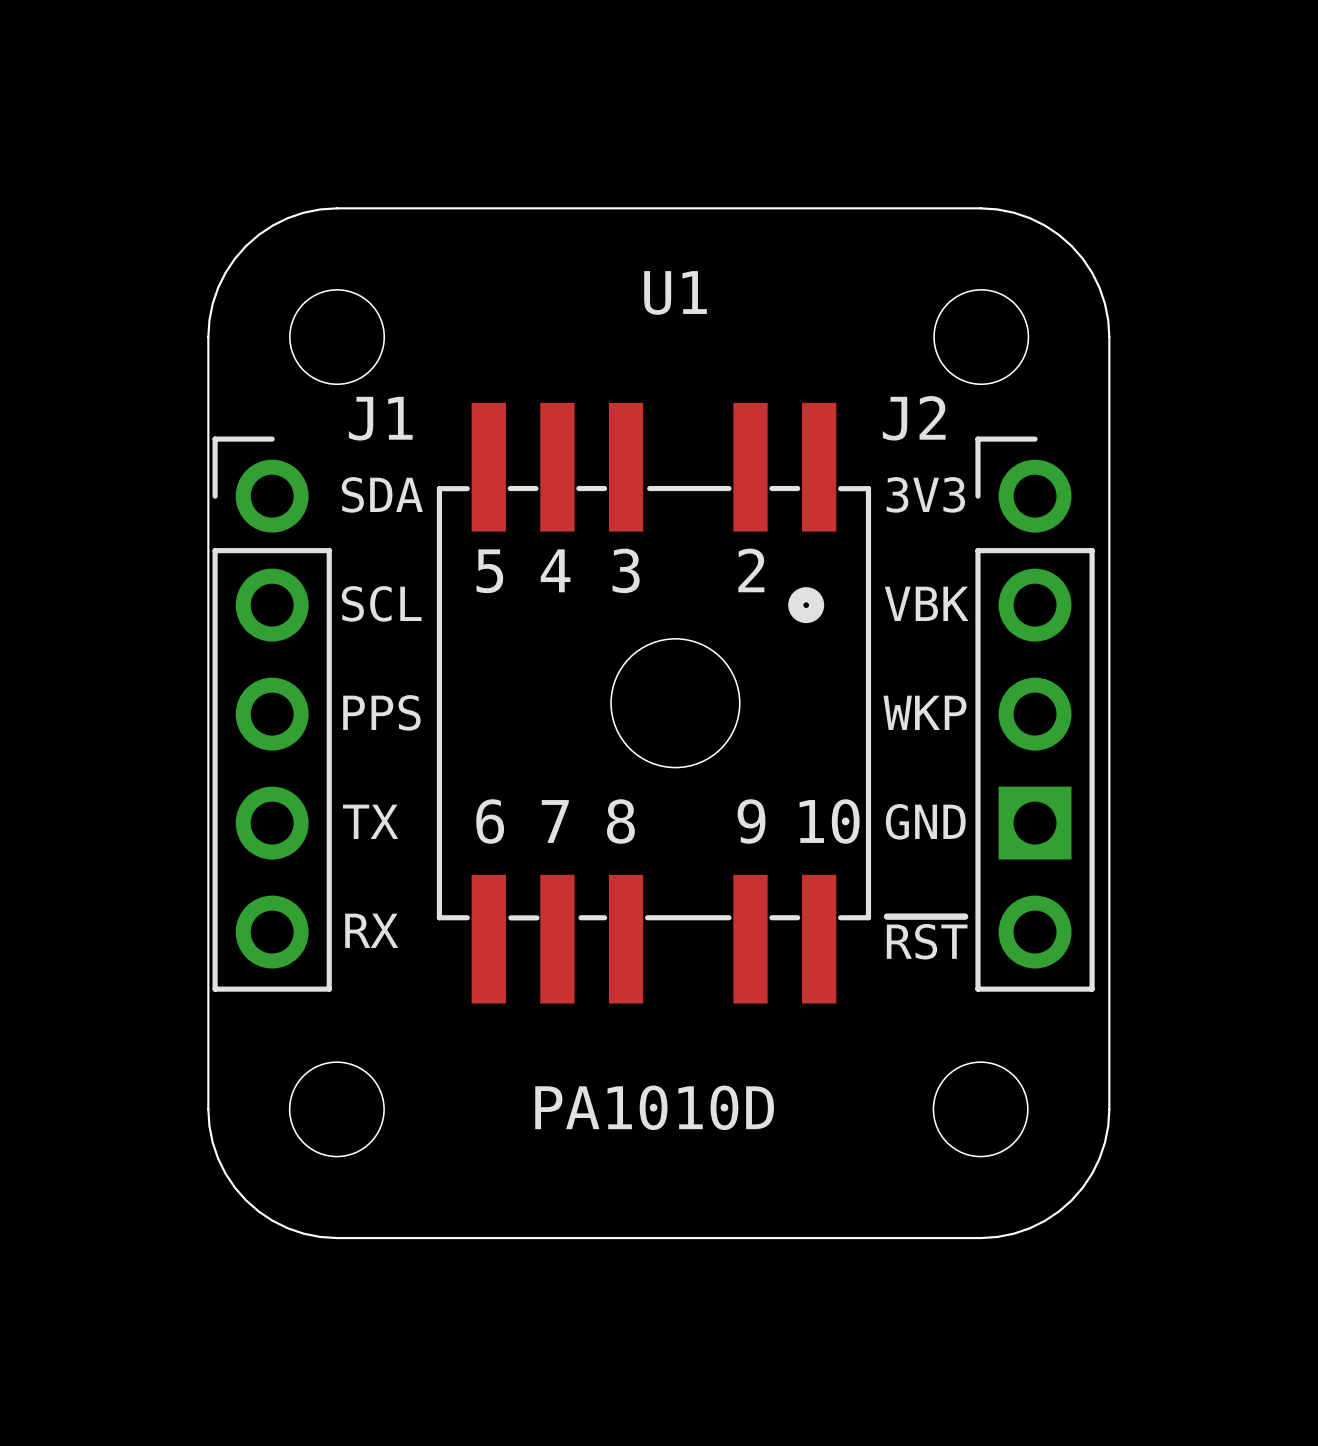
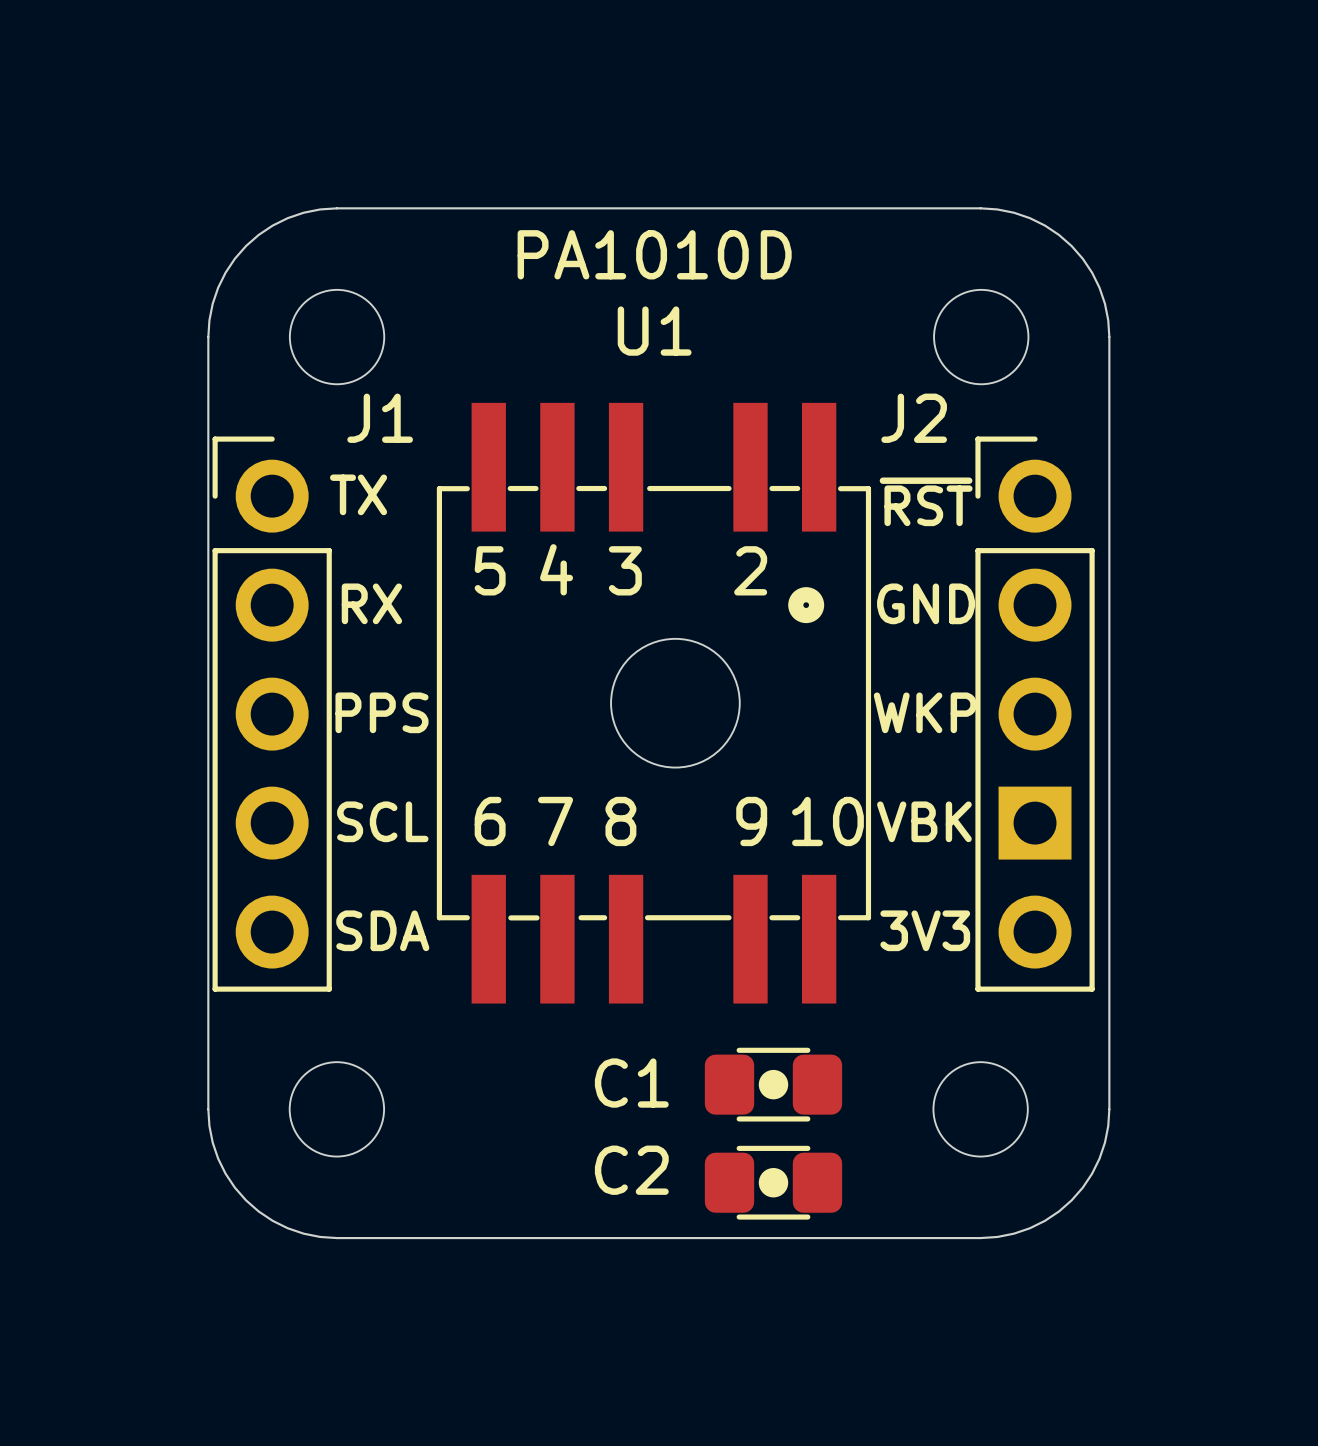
U1 name position: U1 (675, 292) -> U1 (654, 331)
text: SDA (382, 494) -> TX (358, 494)
text: 3V3 (925, 494) -> ~{RST} (926, 501)
text: SCL (381, 603) -> RX (371, 603)
text: VBK (926, 603) -> GND (926, 603)
text: TX (370, 821) -> SCL (382, 821)
text: GND (925, 821) -> VBK (924, 821)
text: RX (371, 930) -> SDA (382, 930)
text: ~{RST} (927, 938) -> 3V3 (925, 930)
C1: none -> (773, 1084)
text position: PA1010D (654, 1107) -> PA1010D (654, 254)
C2: none -> (773, 1182)

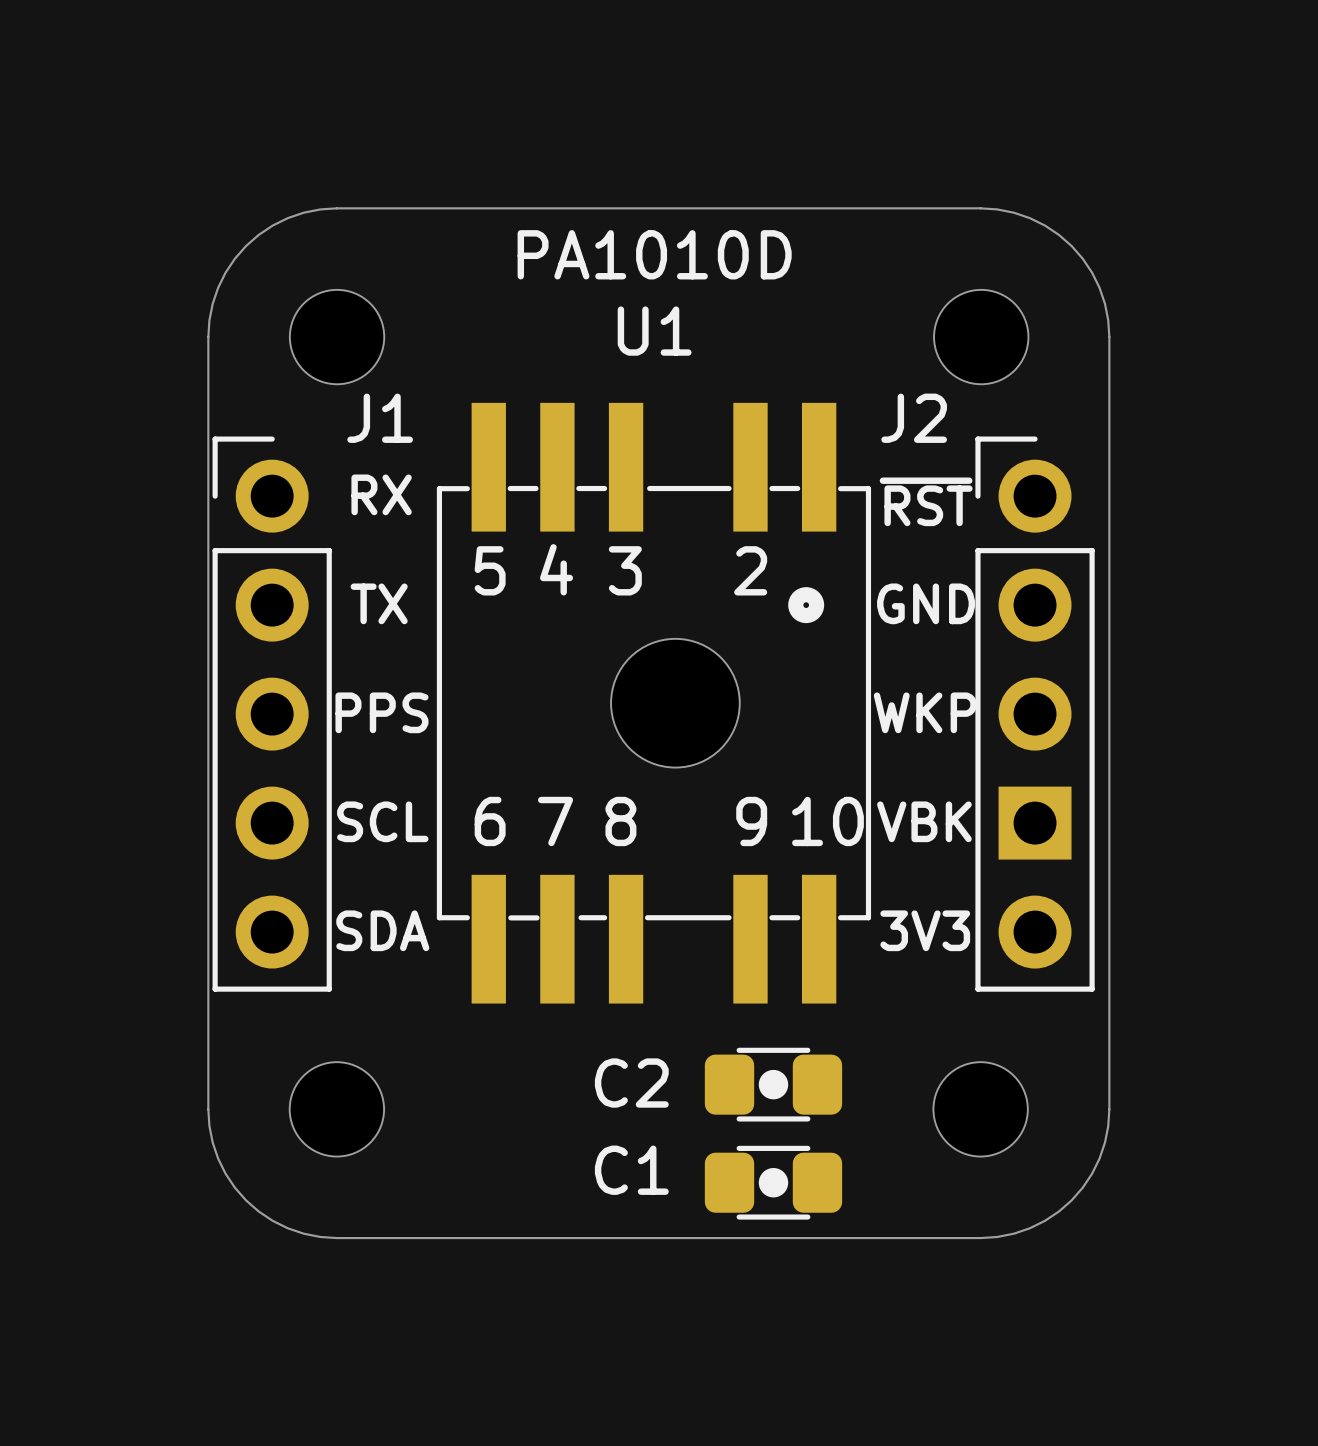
text: TX (358, 494) -> RX (381, 494)
text: RX (371, 603) -> TX (379, 603)
C1 name: C1 (631, 1083) -> C2 (631, 1083)
C2 name: C2 (631, 1170) -> C1 (631, 1170)

